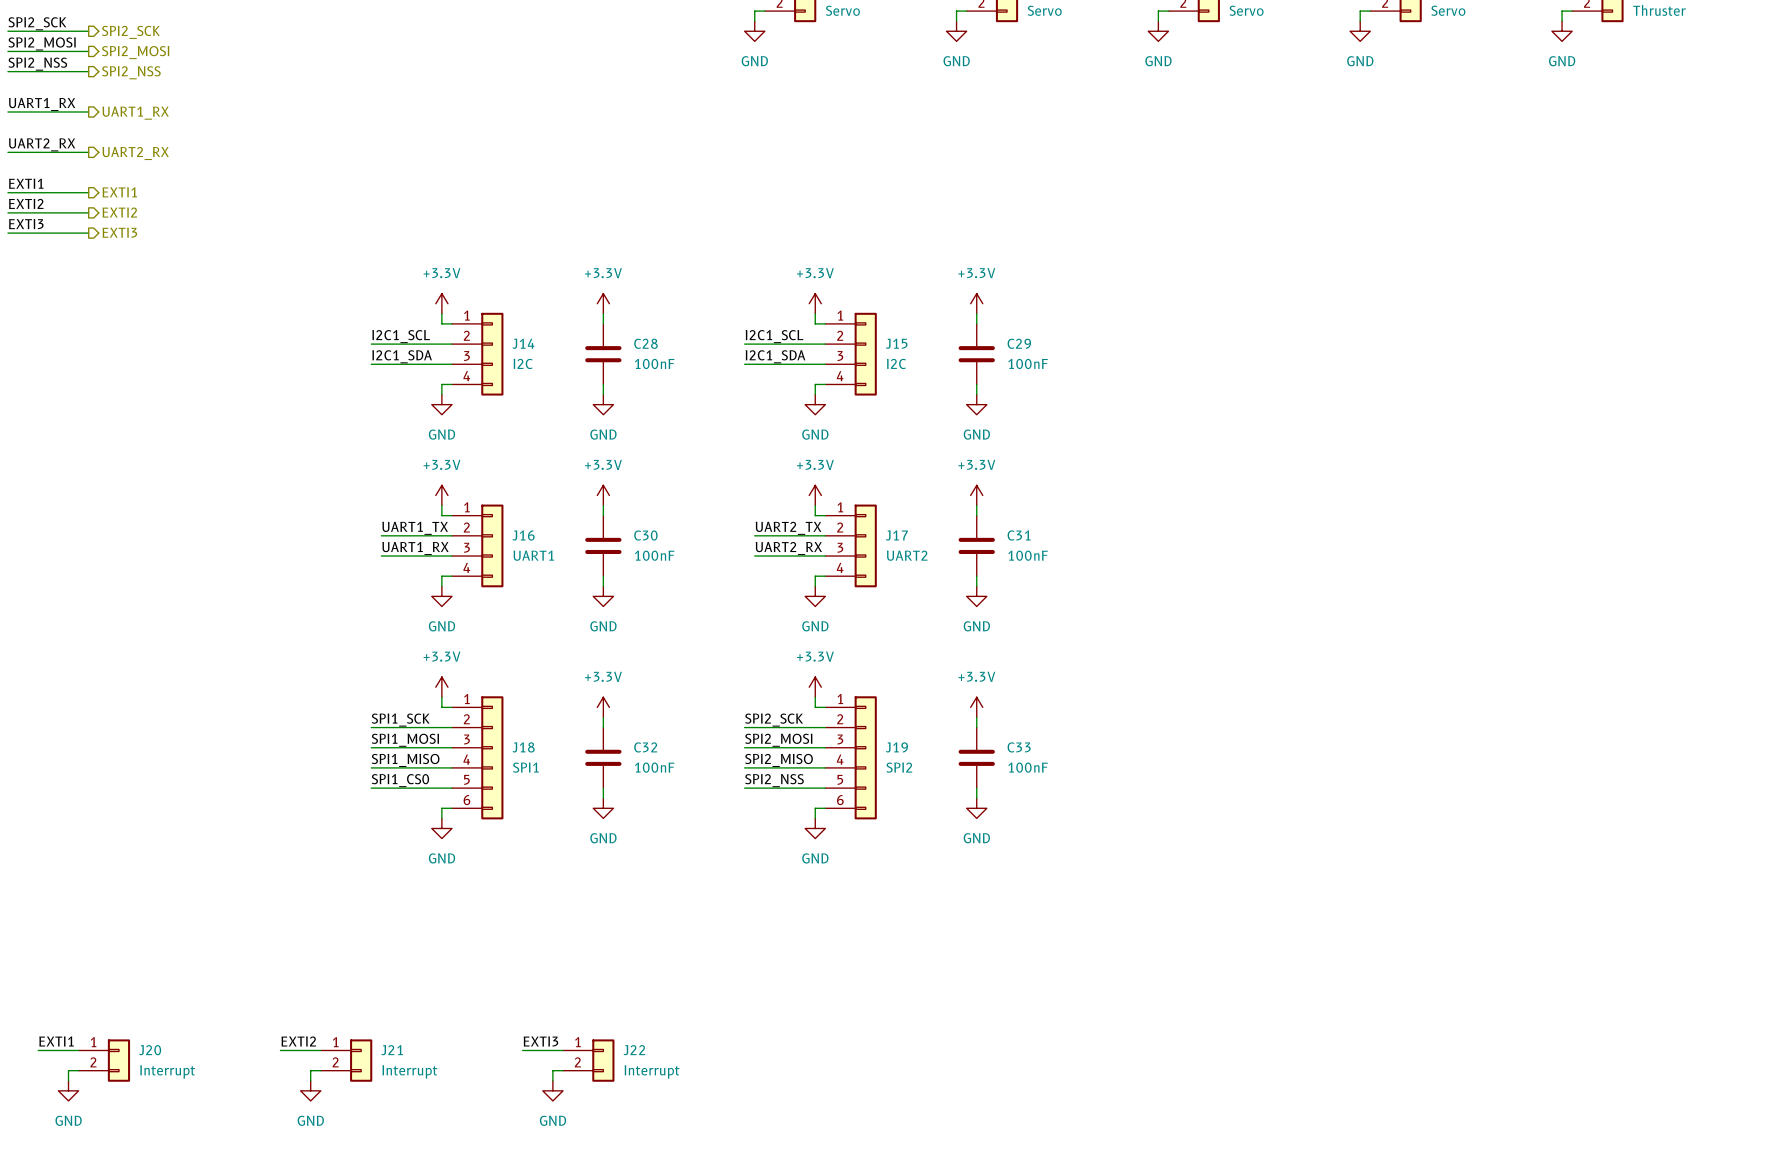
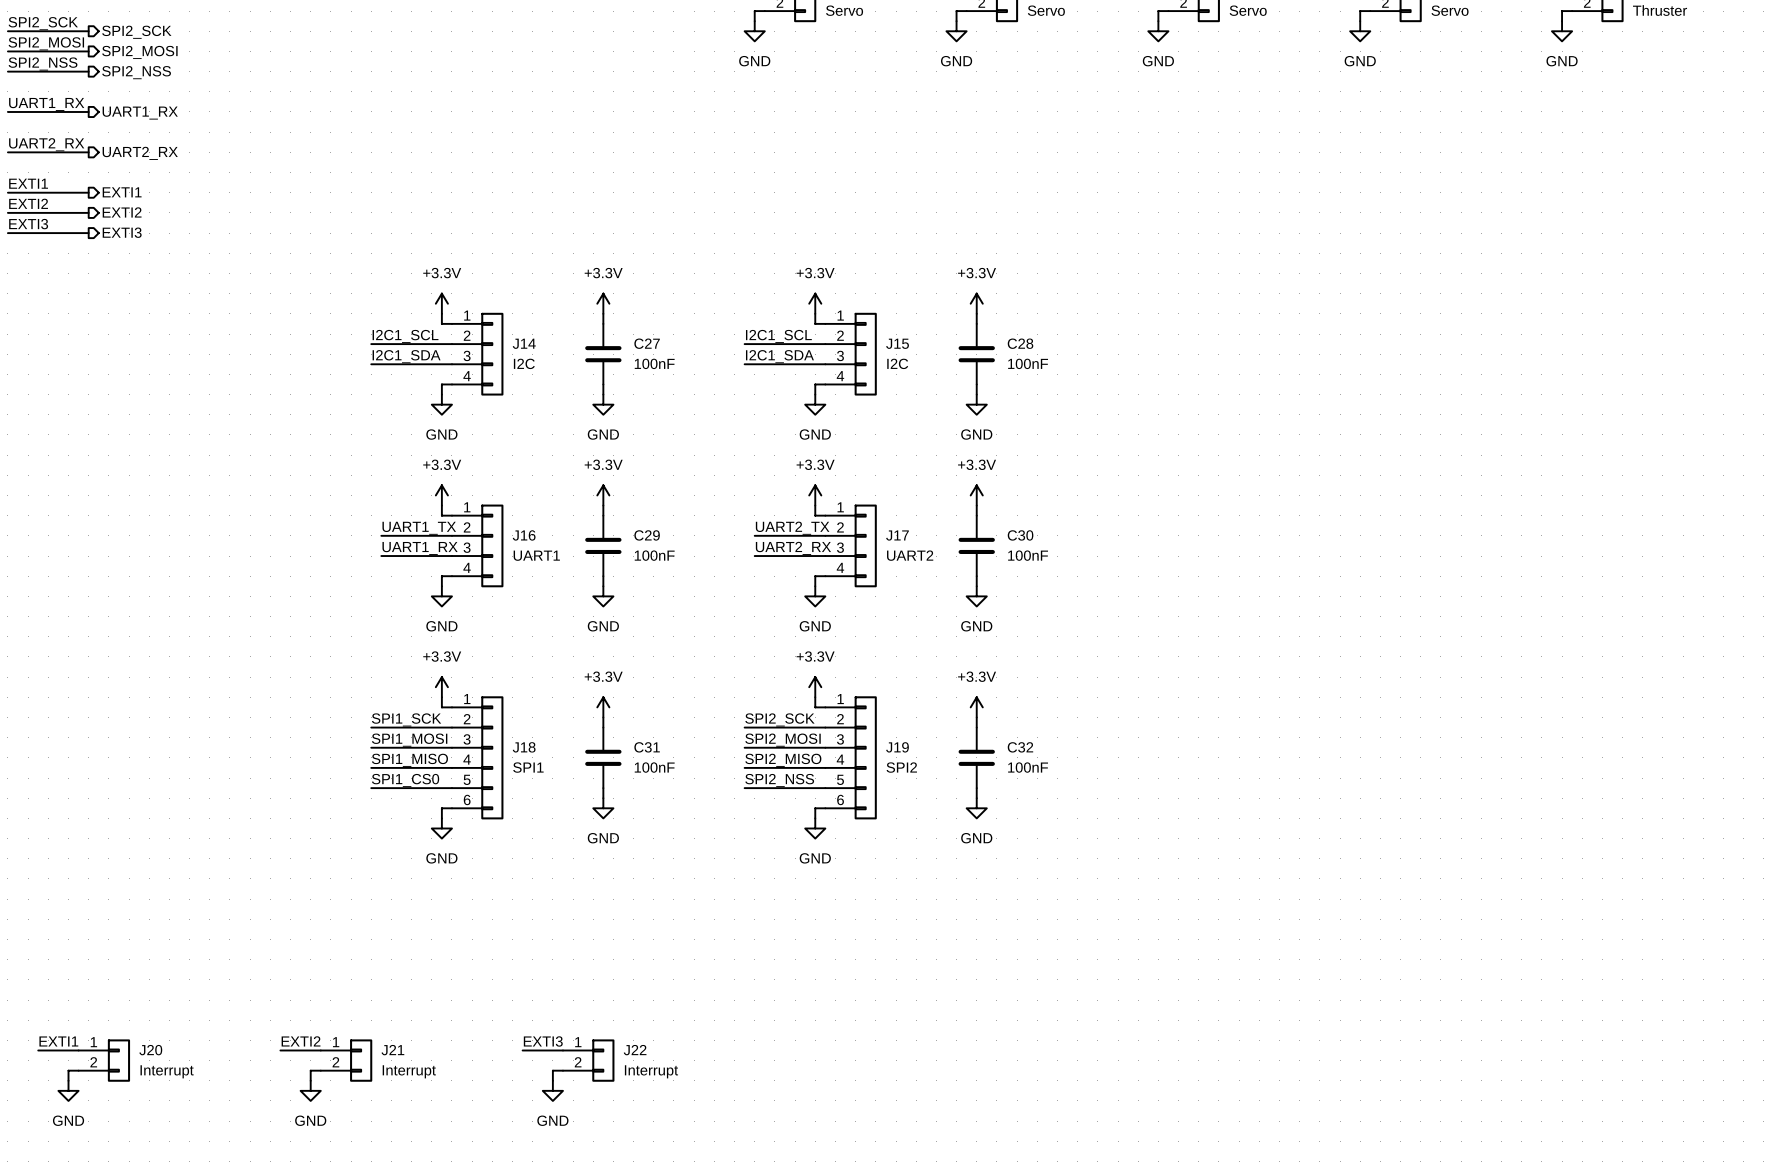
C28 name: C28 (645, 343) -> C27 (647, 343)
C29 name: C29 (1019, 343) -> C28 (1020, 343)
C30 name: C30 (645, 535) -> C29 (647, 535)
C31 name: C31 (1019, 535) -> C30 (1020, 535)
C32 name: C32 (645, 747) -> C31 (647, 747)
C33 name: C33 (1019, 747) -> C32 (1020, 747)

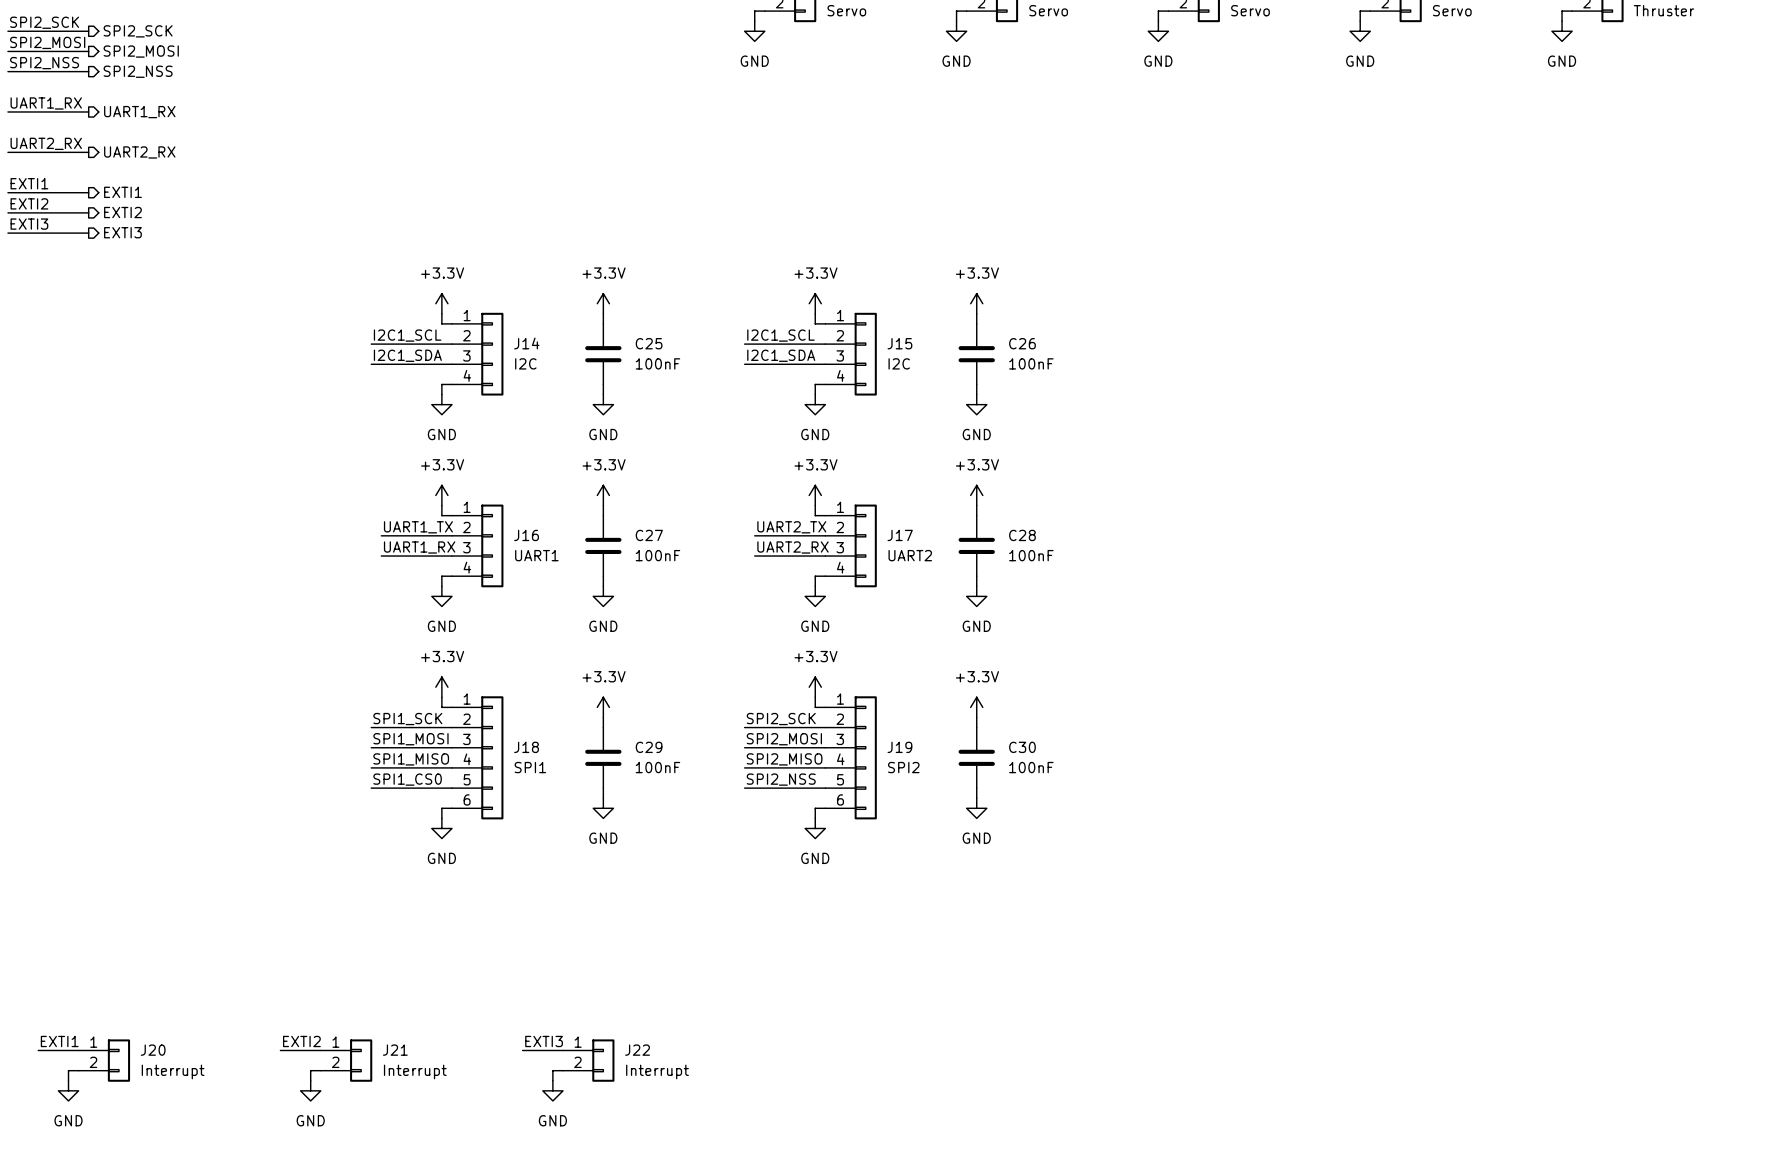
C27 name: C27 (647, 343) -> C25 (649, 343)
C28 name: C28 (1020, 343) -> C26 (1022, 343)
C29 name: C29 (647, 535) -> C27 (649, 535)
C30 name: C30 (1020, 535) -> C28 (1022, 535)
C31 name: C31 (647, 747) -> C29 (649, 747)
C32 name: C32 (1020, 747) -> C30 (1022, 747)

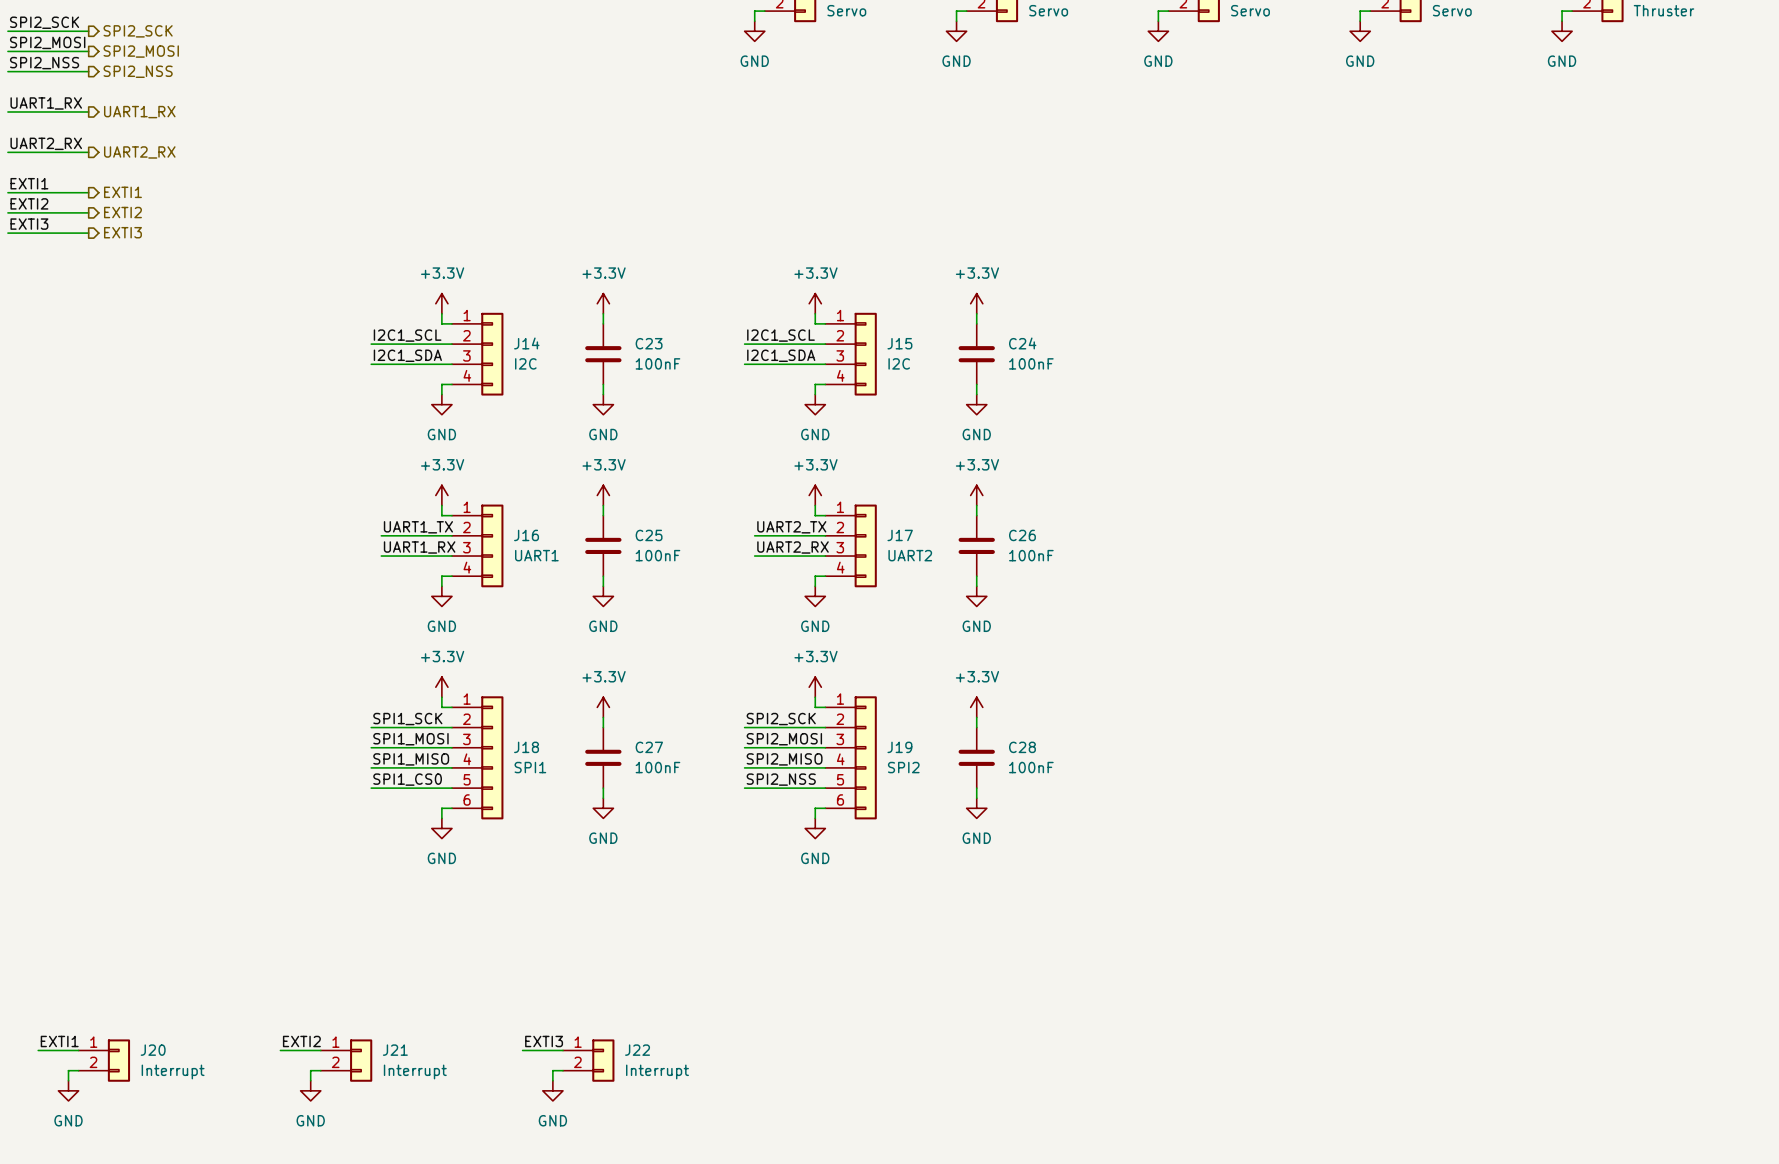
C25 name: C25 (649, 343) -> C23 (649, 343)
C26 name: C26 (1022, 343) -> C24 (1022, 343)
C27 name: C27 (649, 535) -> C25 (649, 535)
C28 name: C28 (1022, 535) -> C26 (1022, 535)
C29 name: C29 (649, 747) -> C27 (649, 747)
C30 name: C30 (1022, 747) -> C28 (1022, 747)

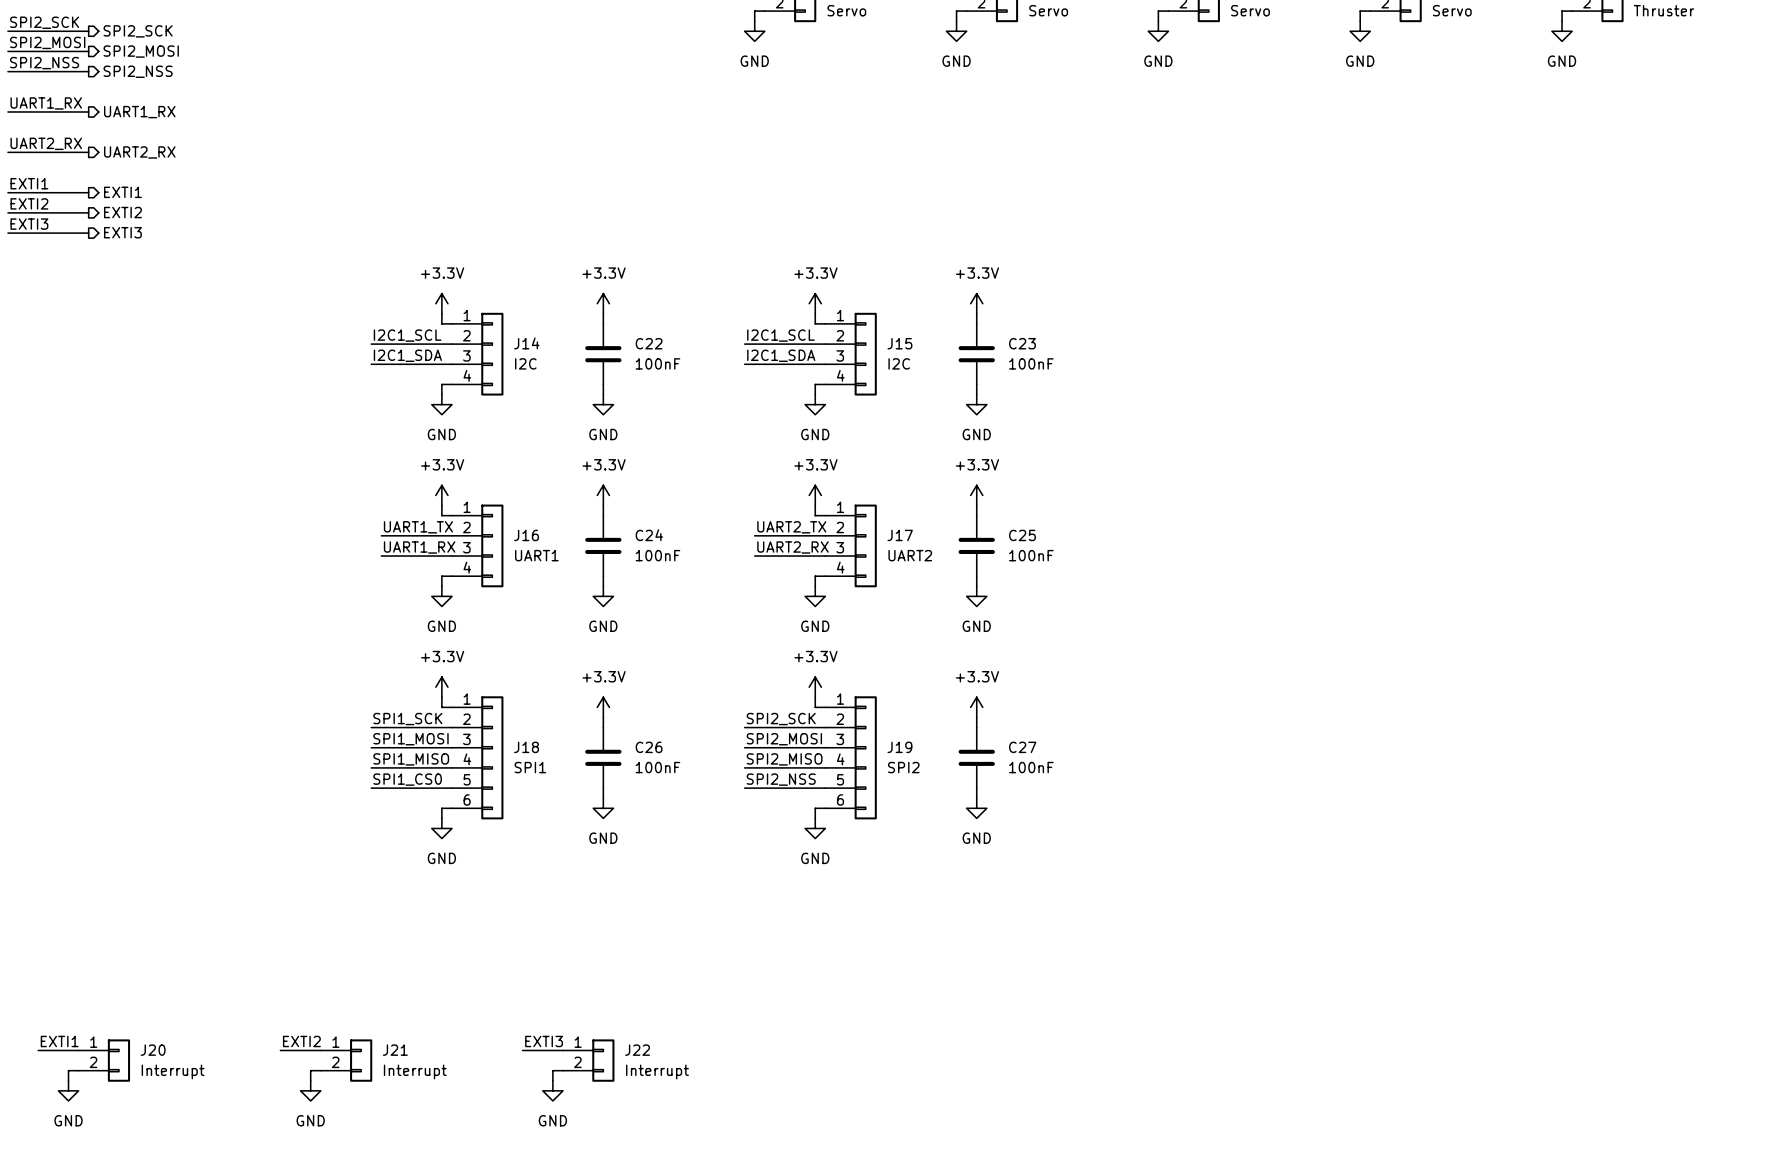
C23 name: C23 (649, 343) -> C22 (649, 343)
C24 name: C24 (1022, 343) -> C23 (1022, 343)
C25 name: C25 (649, 535) -> C24 (649, 535)
C26 name: C26 (1022, 535) -> C25 (1022, 535)
C27 name: C27 (649, 747) -> C26 (649, 747)
C28 name: C28 (1022, 747) -> C27 (1022, 747)

